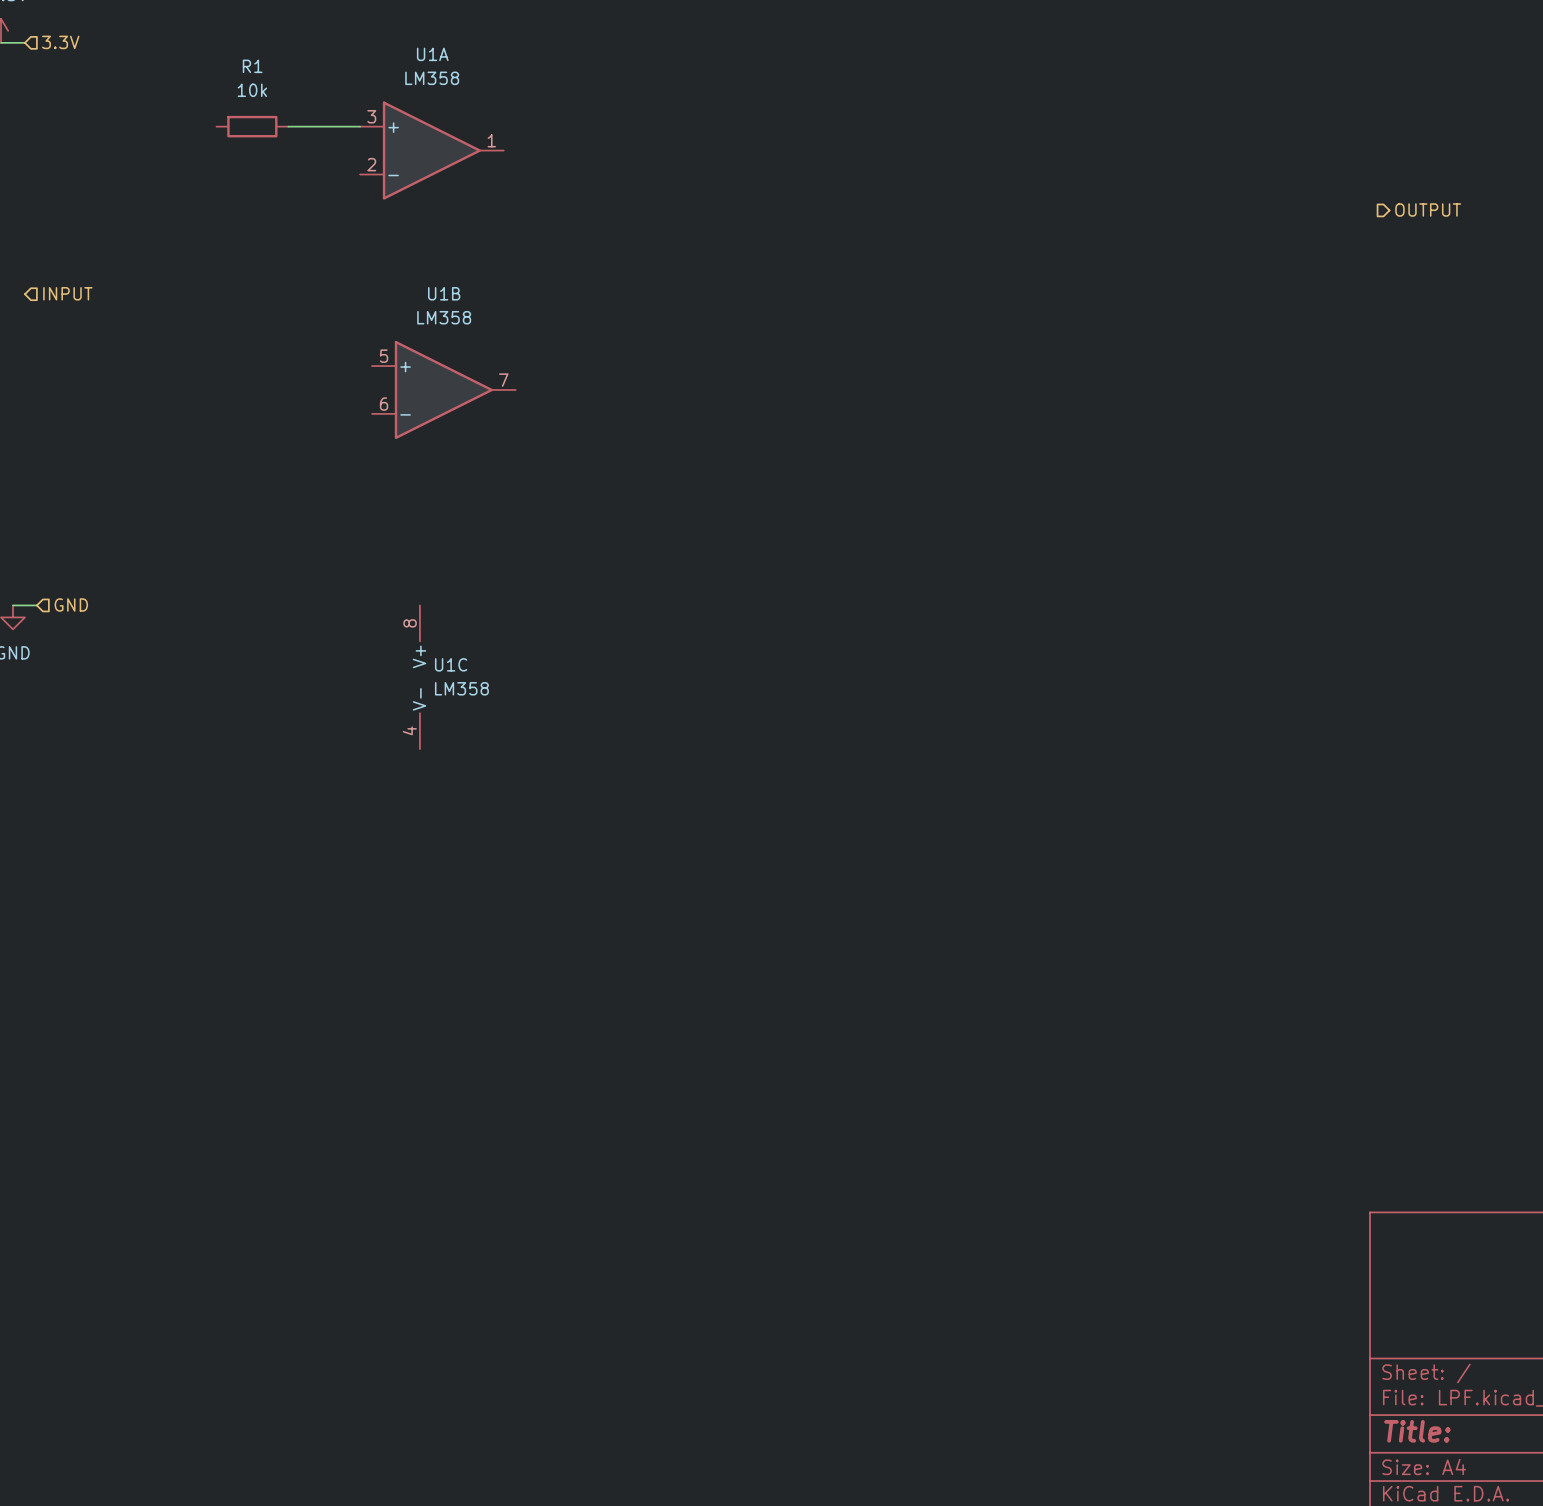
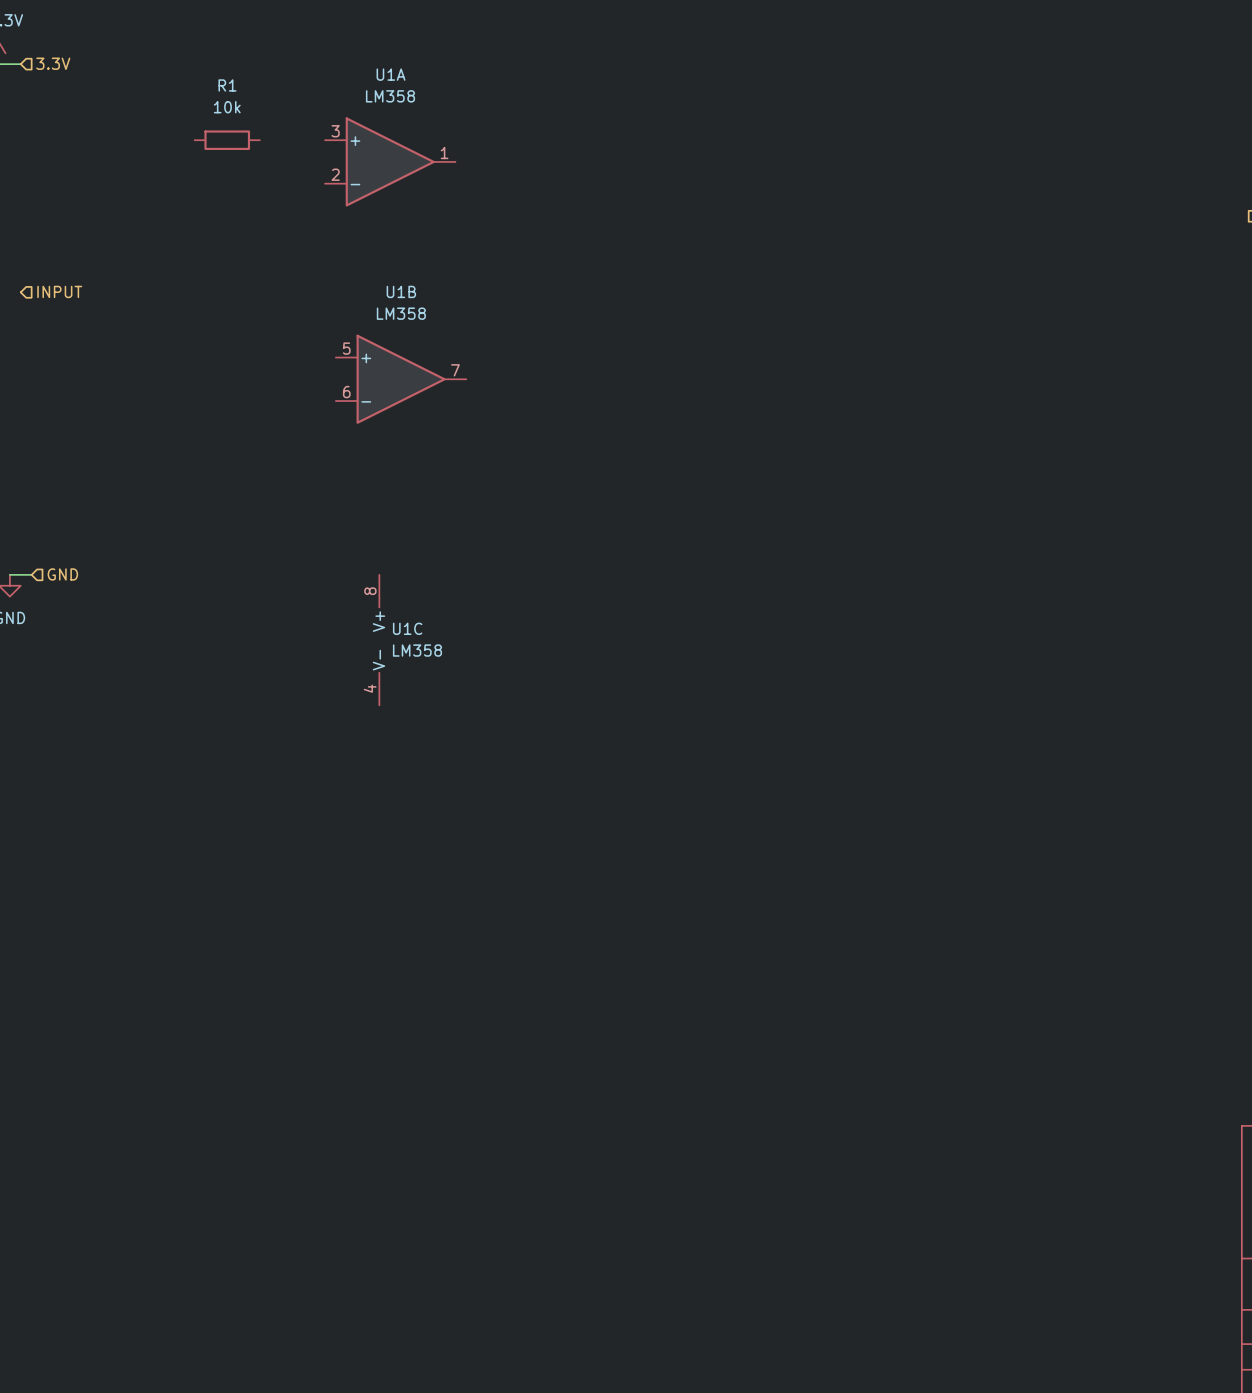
wire: (288, 126) (360, 126) -> none

